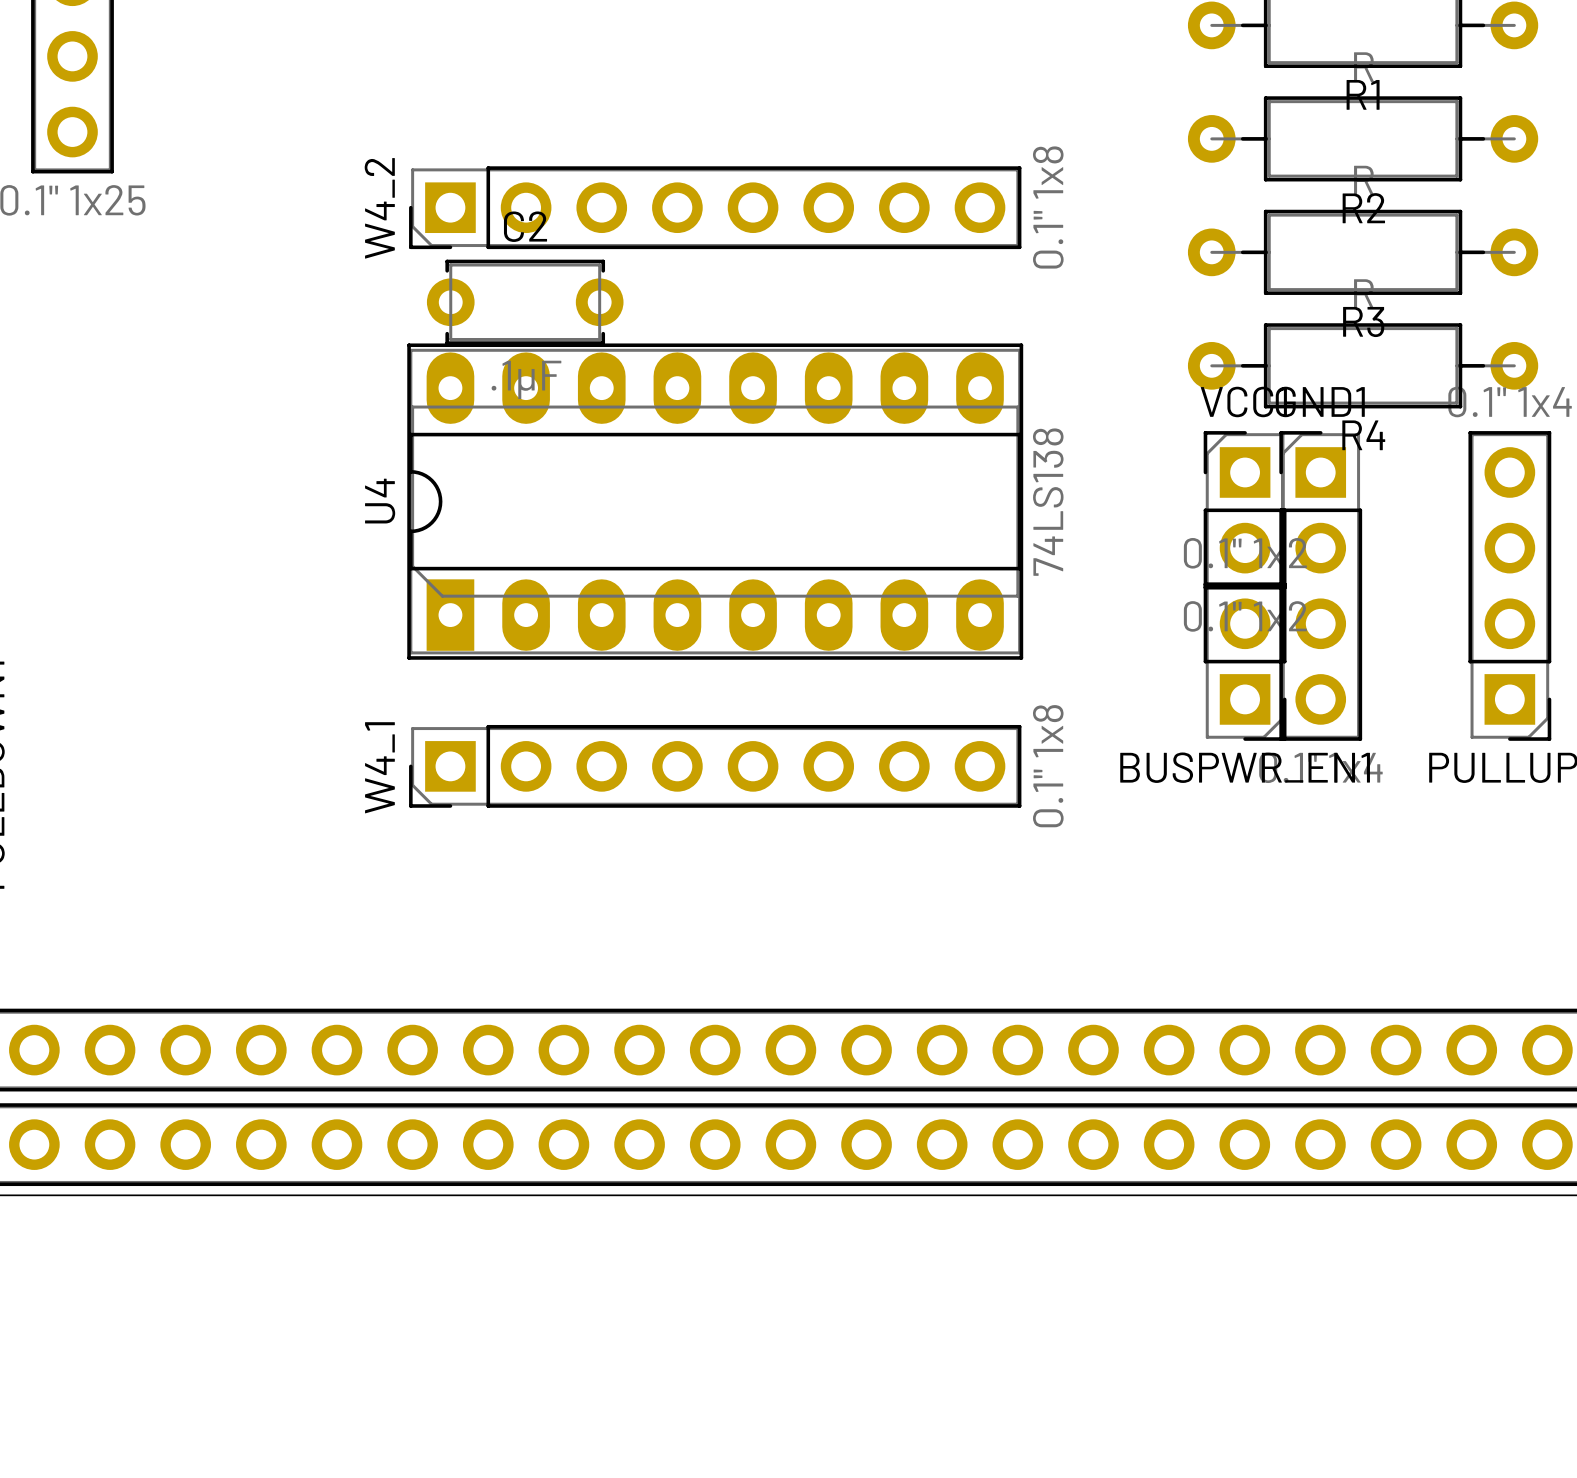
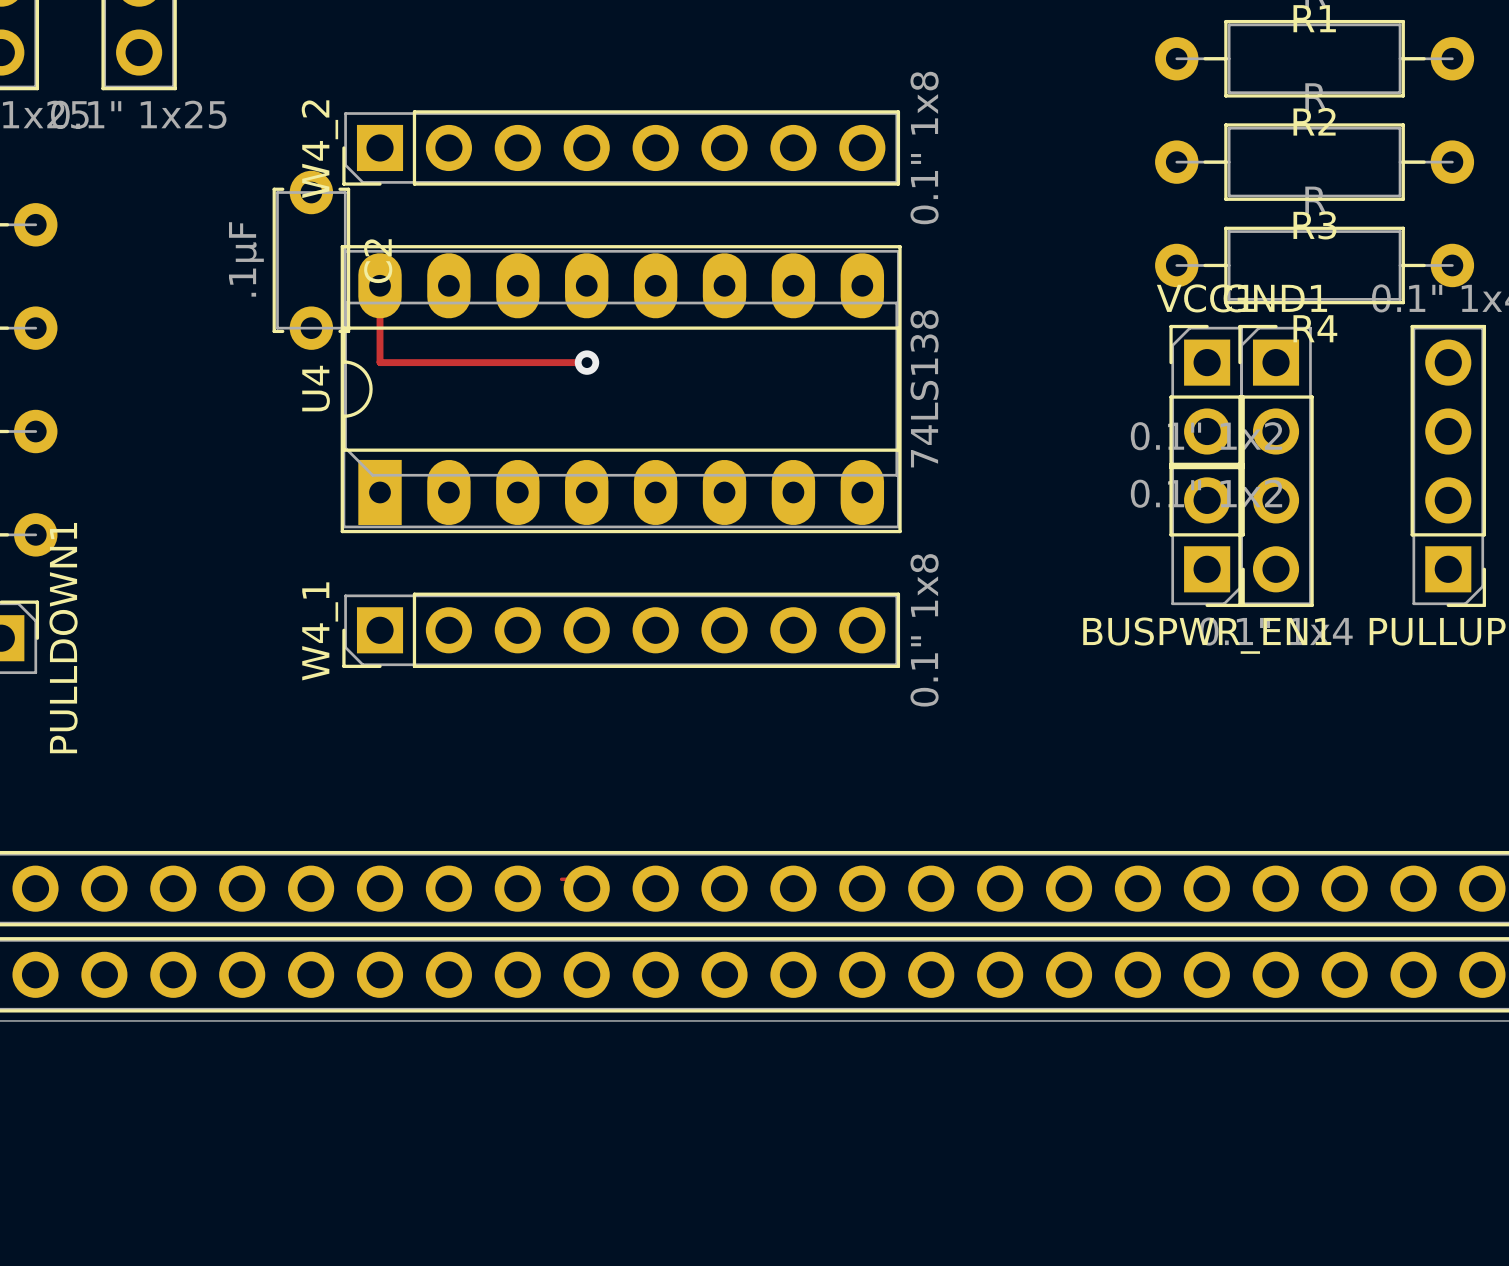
W4_2 position: (715, 207) -> (621, 147)
C2 rotation: 0° (525, 302) -> 90° clockwise (311, 260)
C2 position: (525, 302) -> (311, 260)
track: none -> (380, 285) (380, 362)
track: none -> (380, 362) (586, 362)
via: none -> (586, 362)
U4 position: (715, 501) -> (621, 389)
W4_1 position: (715, 766) -> (621, 630)
track: none -> (561, 879) (568, 879)

